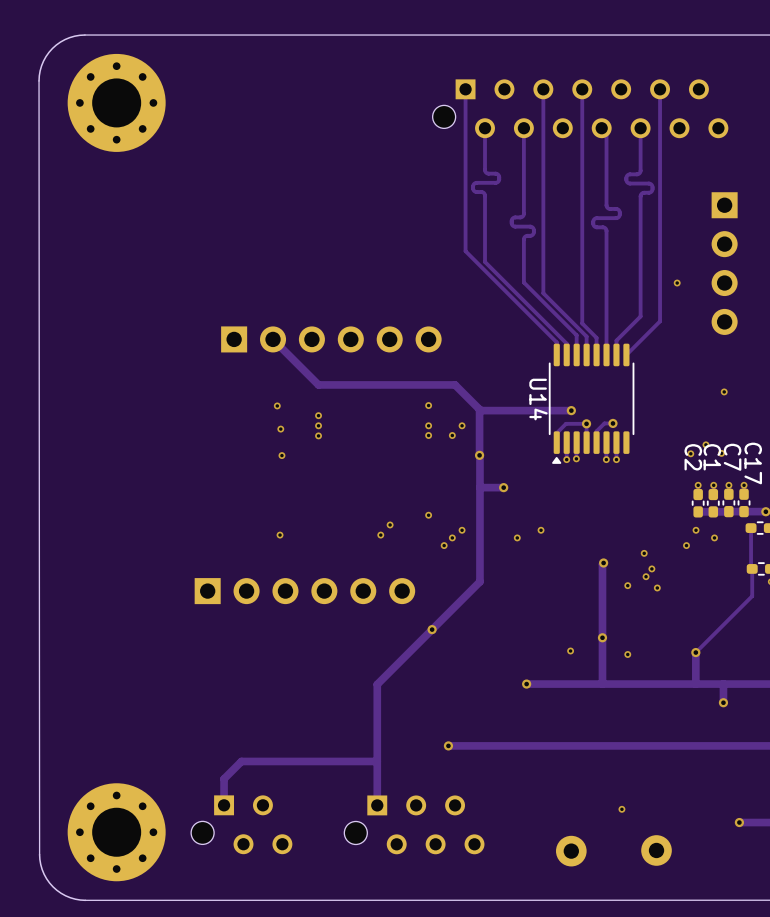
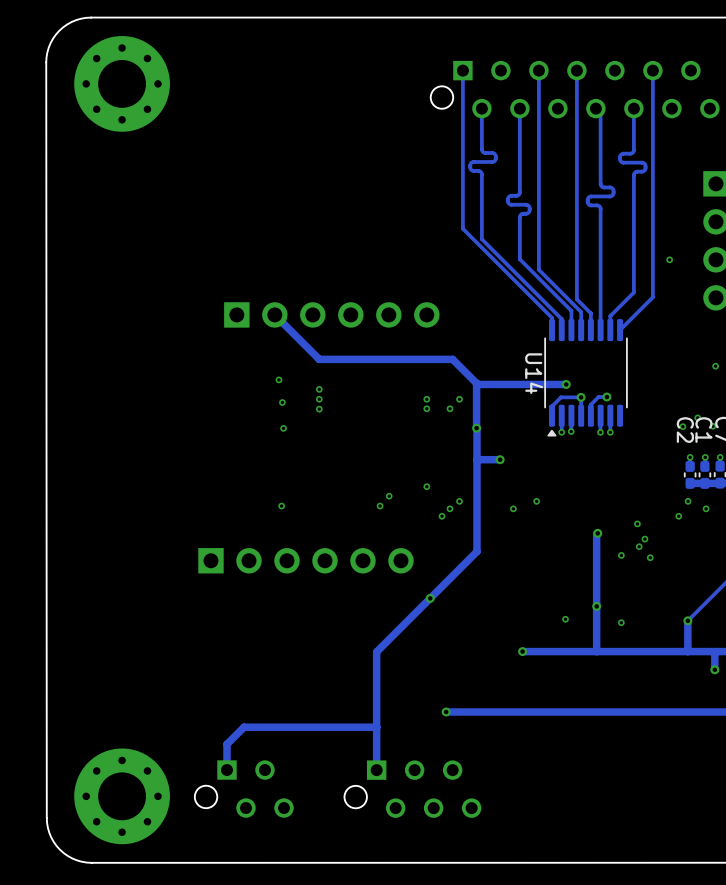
via: (428, 405) -> none
via: (621, 809) -> none
part: (656, 850) -> none
part: (571, 851) -> none

